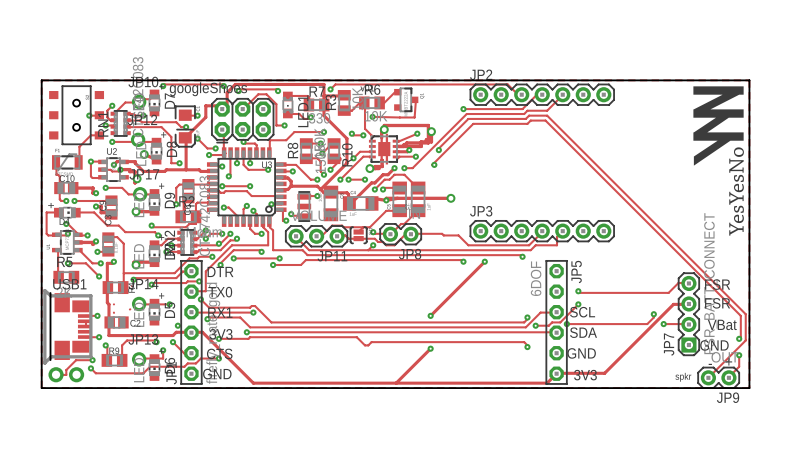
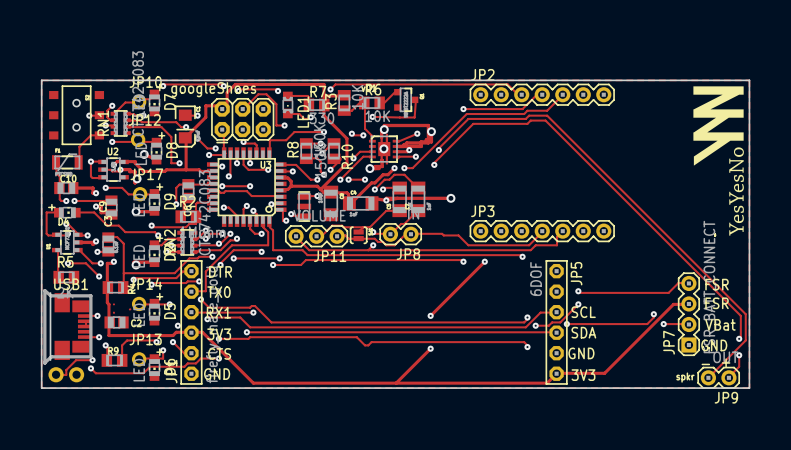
via: none -> (383, 148)

